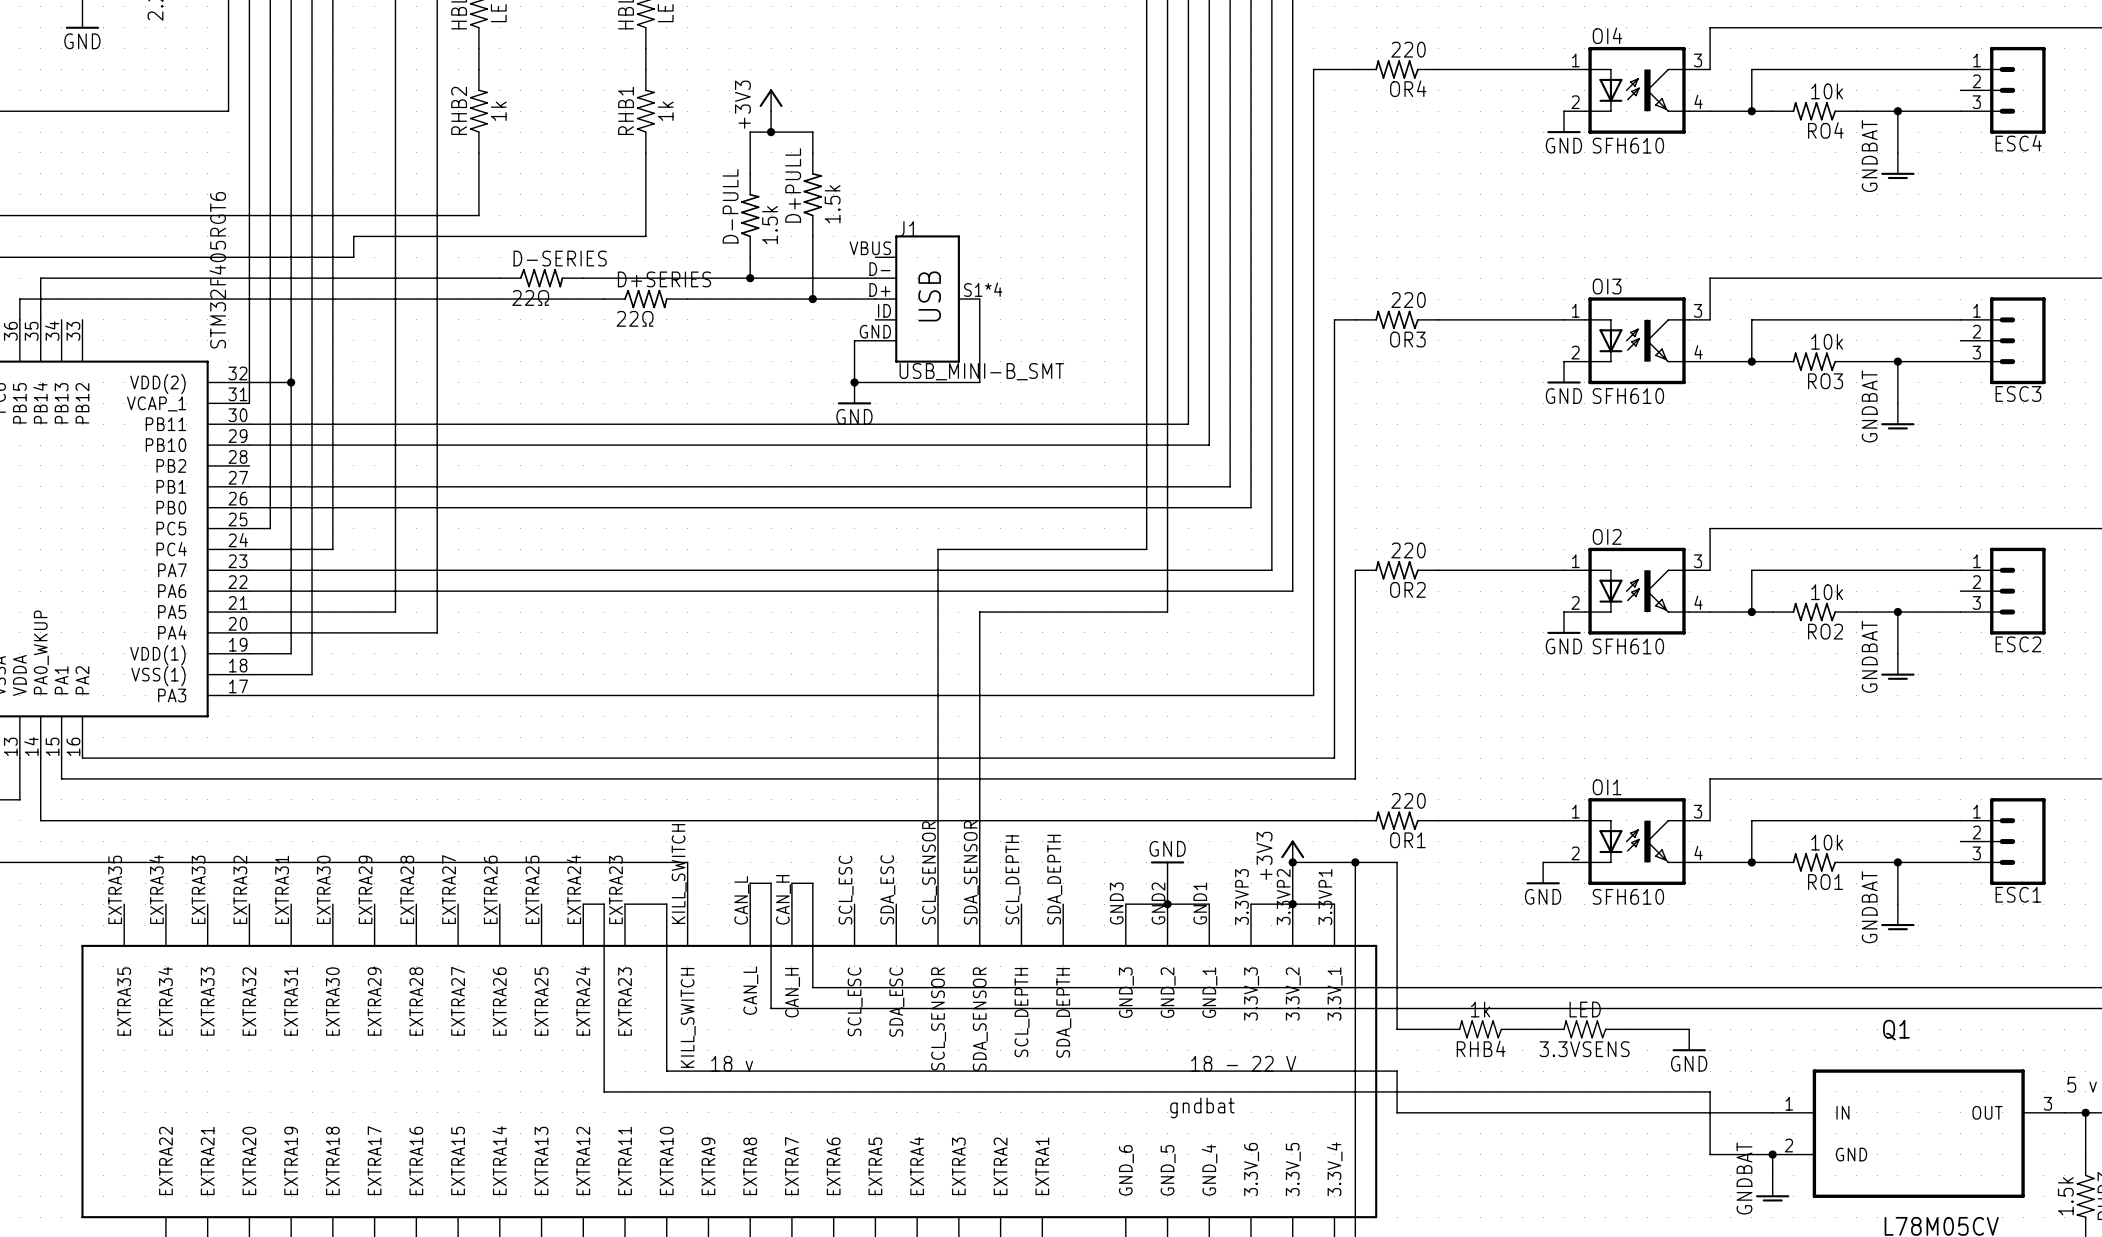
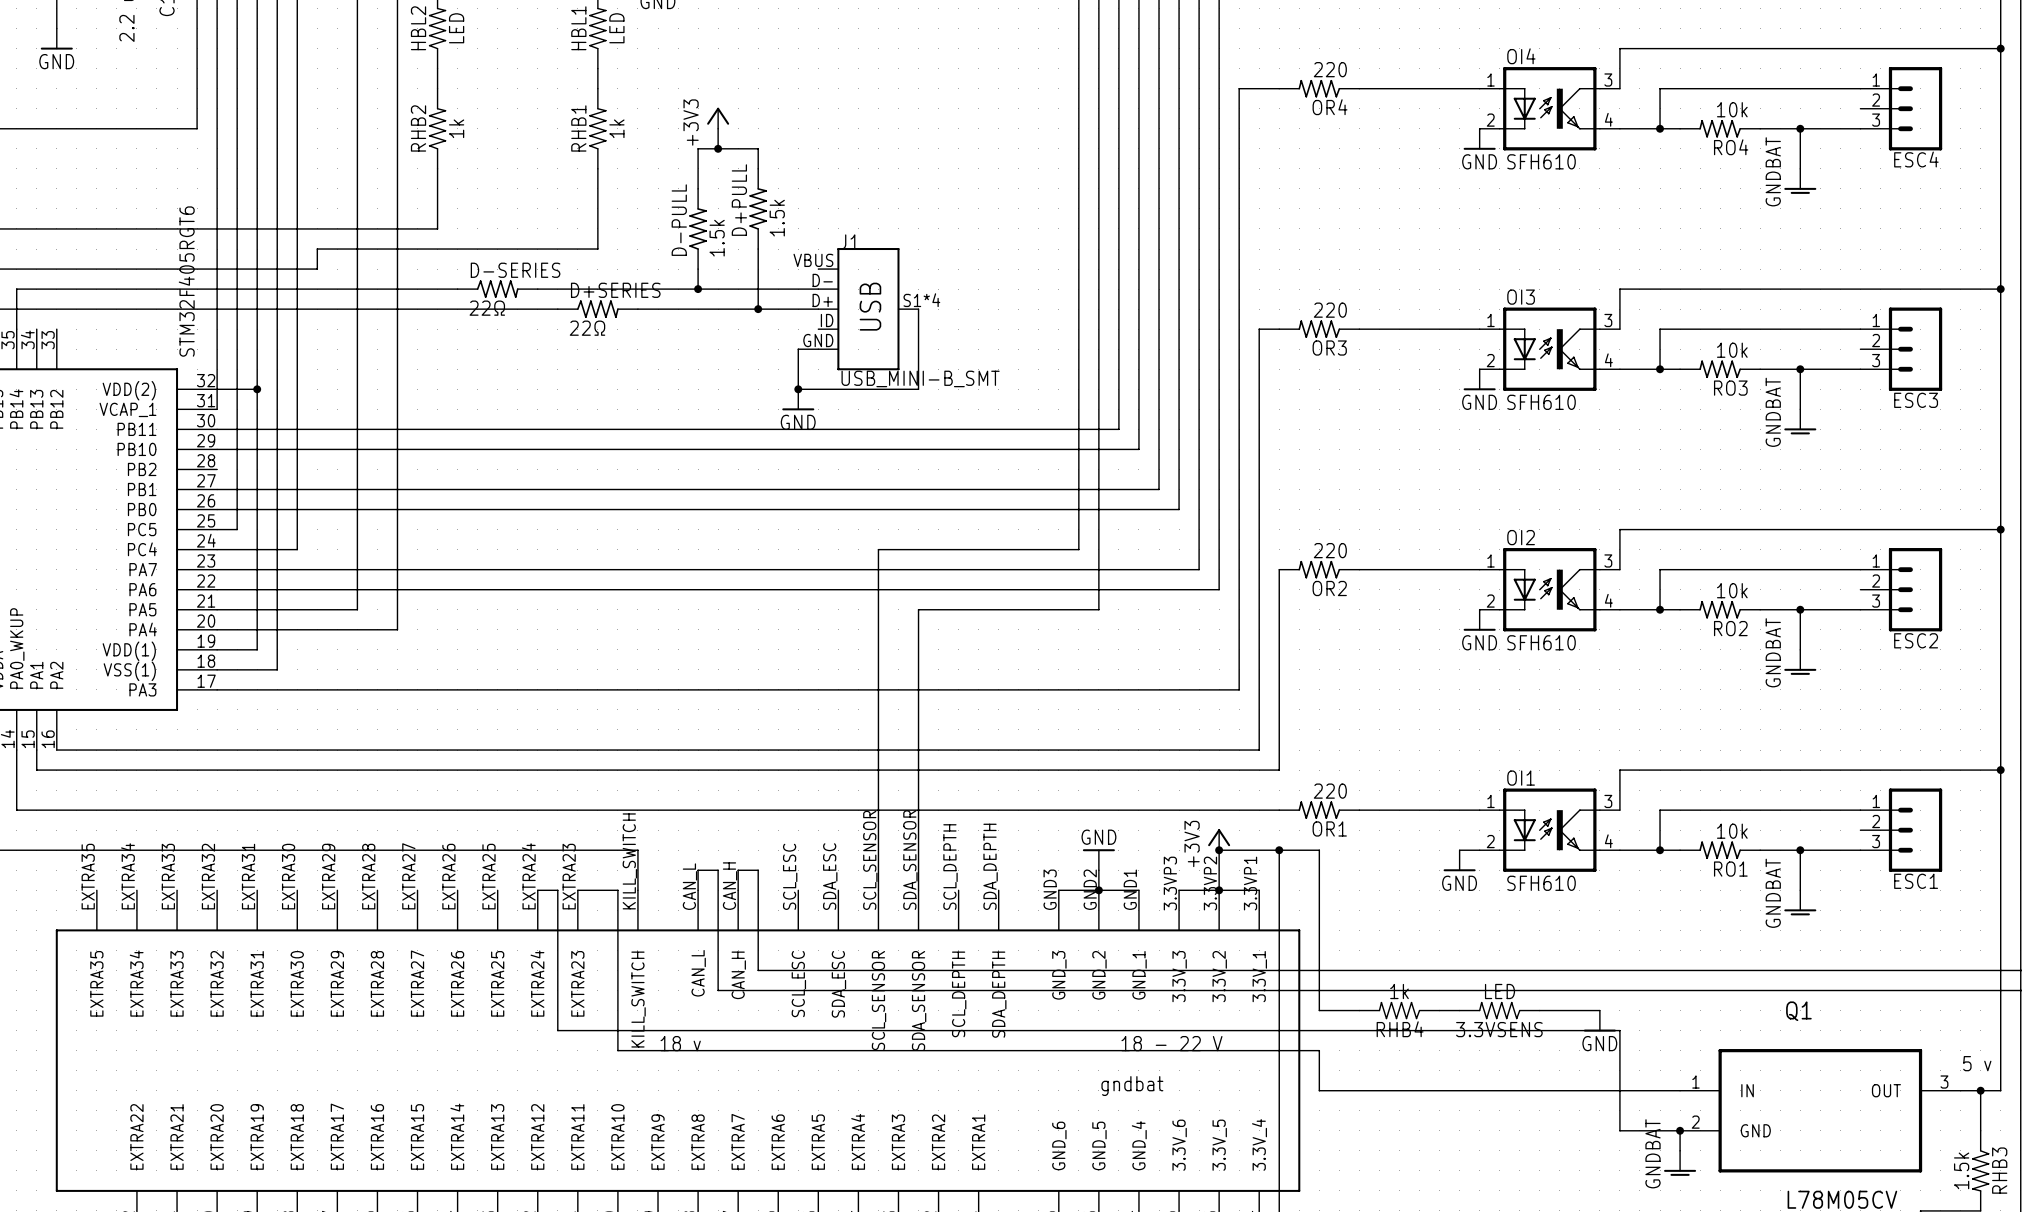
wire: (604, 1050) (604, 1091) (1710, 1091) -> (557, 1030) (1619, 1030) (1619, 1070)

